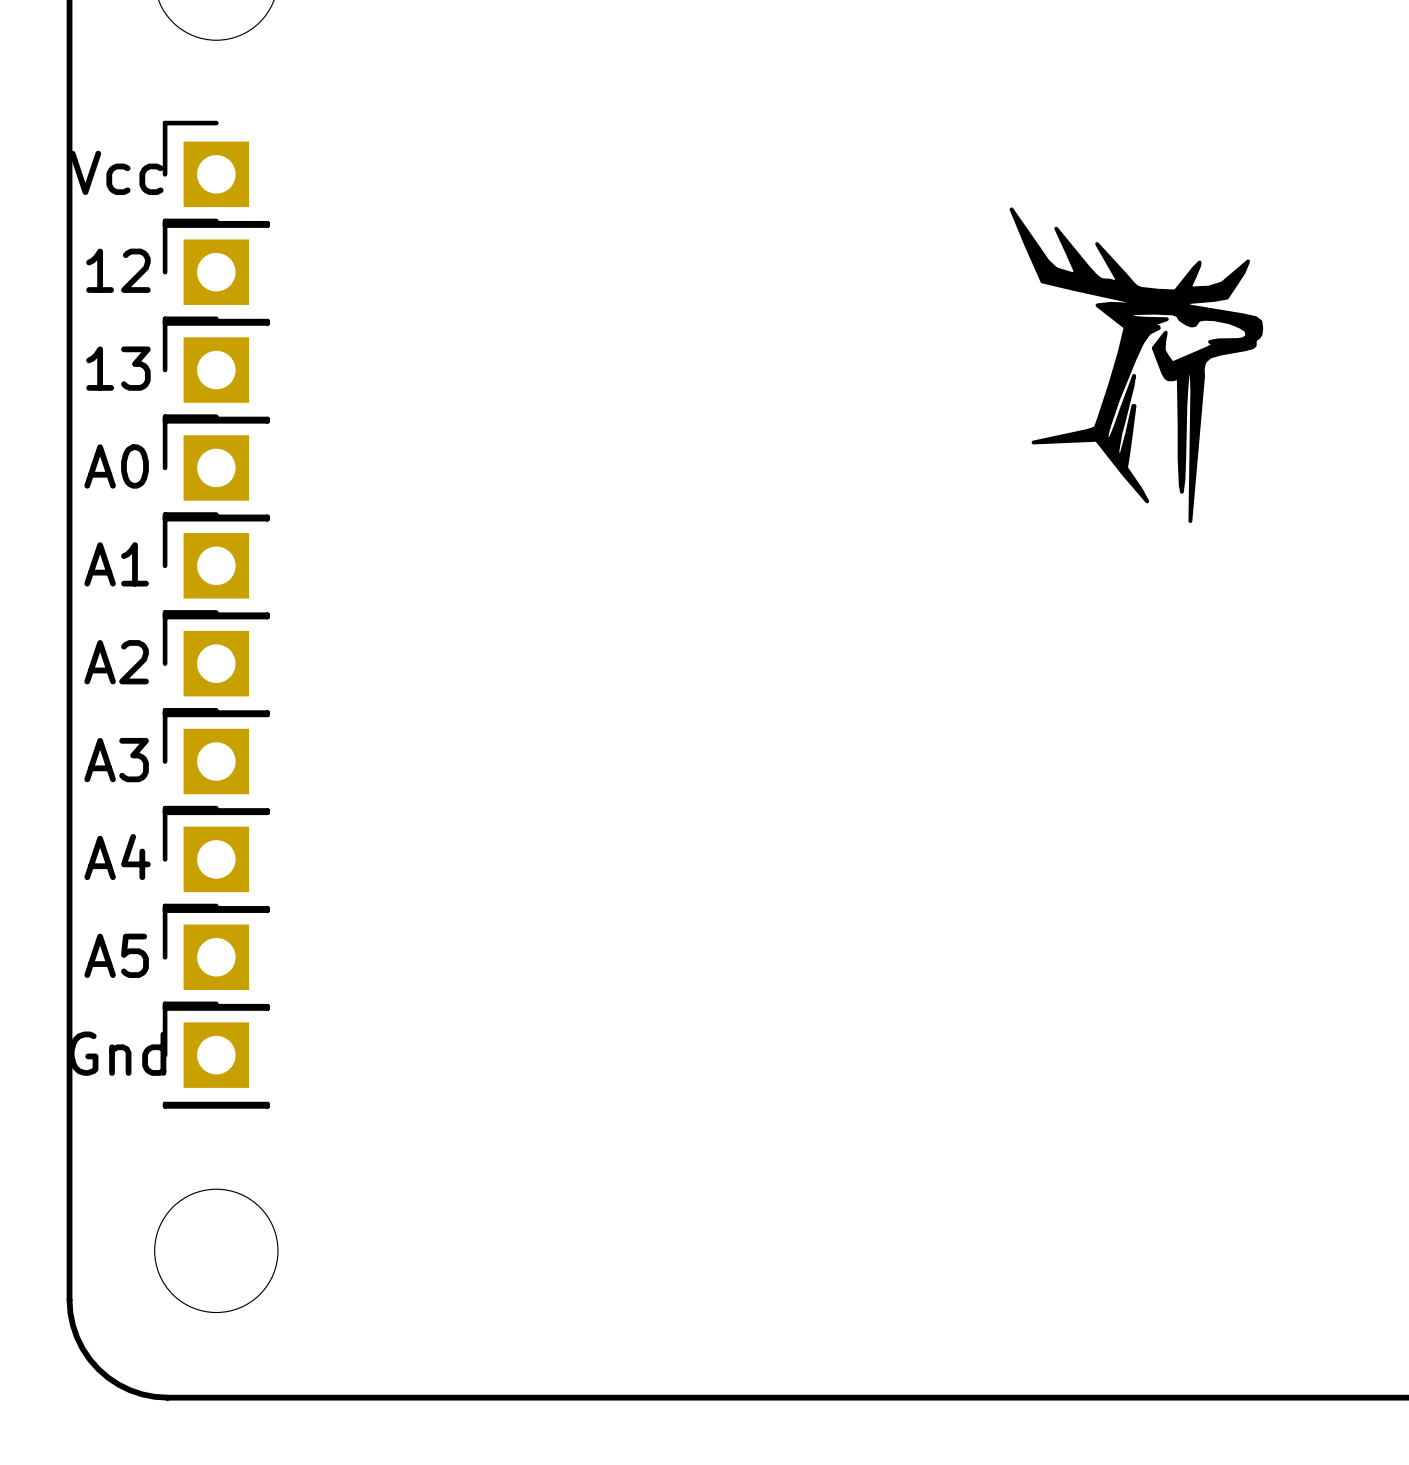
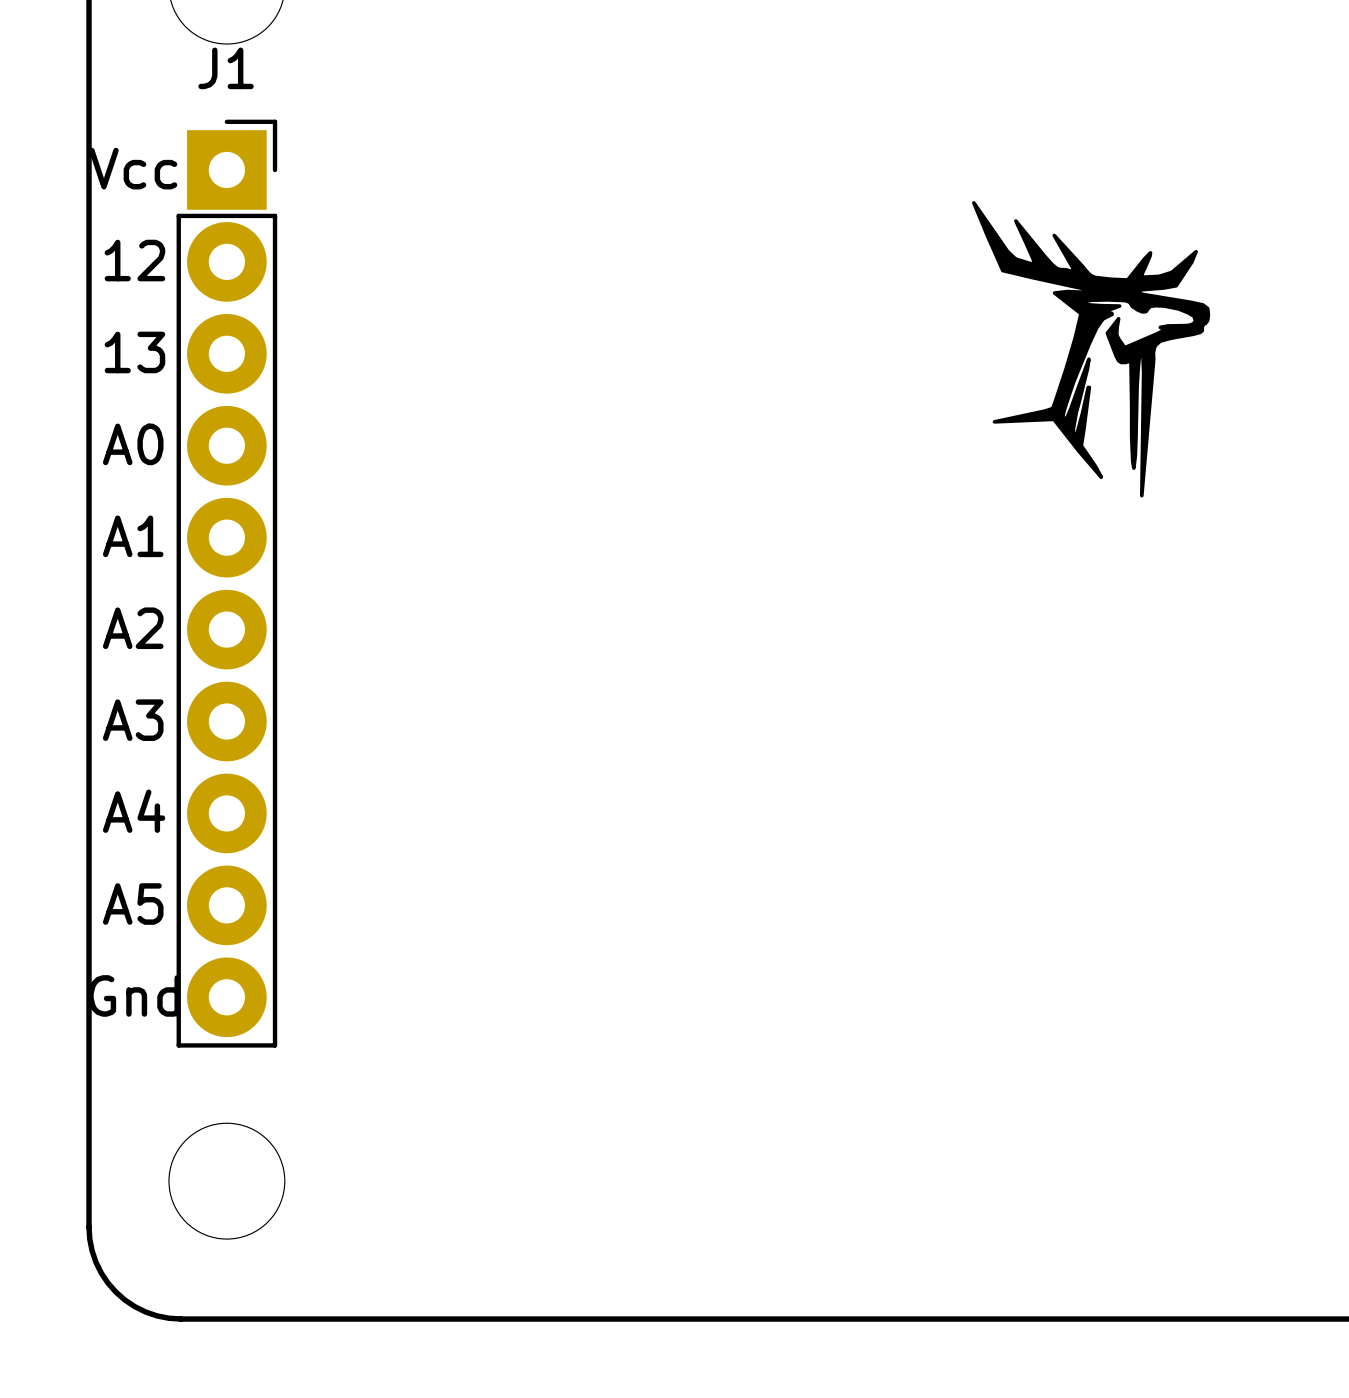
part: (216, 174) -> none
part: (216, 272) -> none
part: (216, 370) -> none
part: (216, 467) -> none
part: (216, 565) -> none
J1: none -> (226, 583)
part: (216, 663) -> none
part: (216, 761) -> none
part: (216, 859) -> none
part: (216, 957) -> none
part: (216, 1055) -> none

